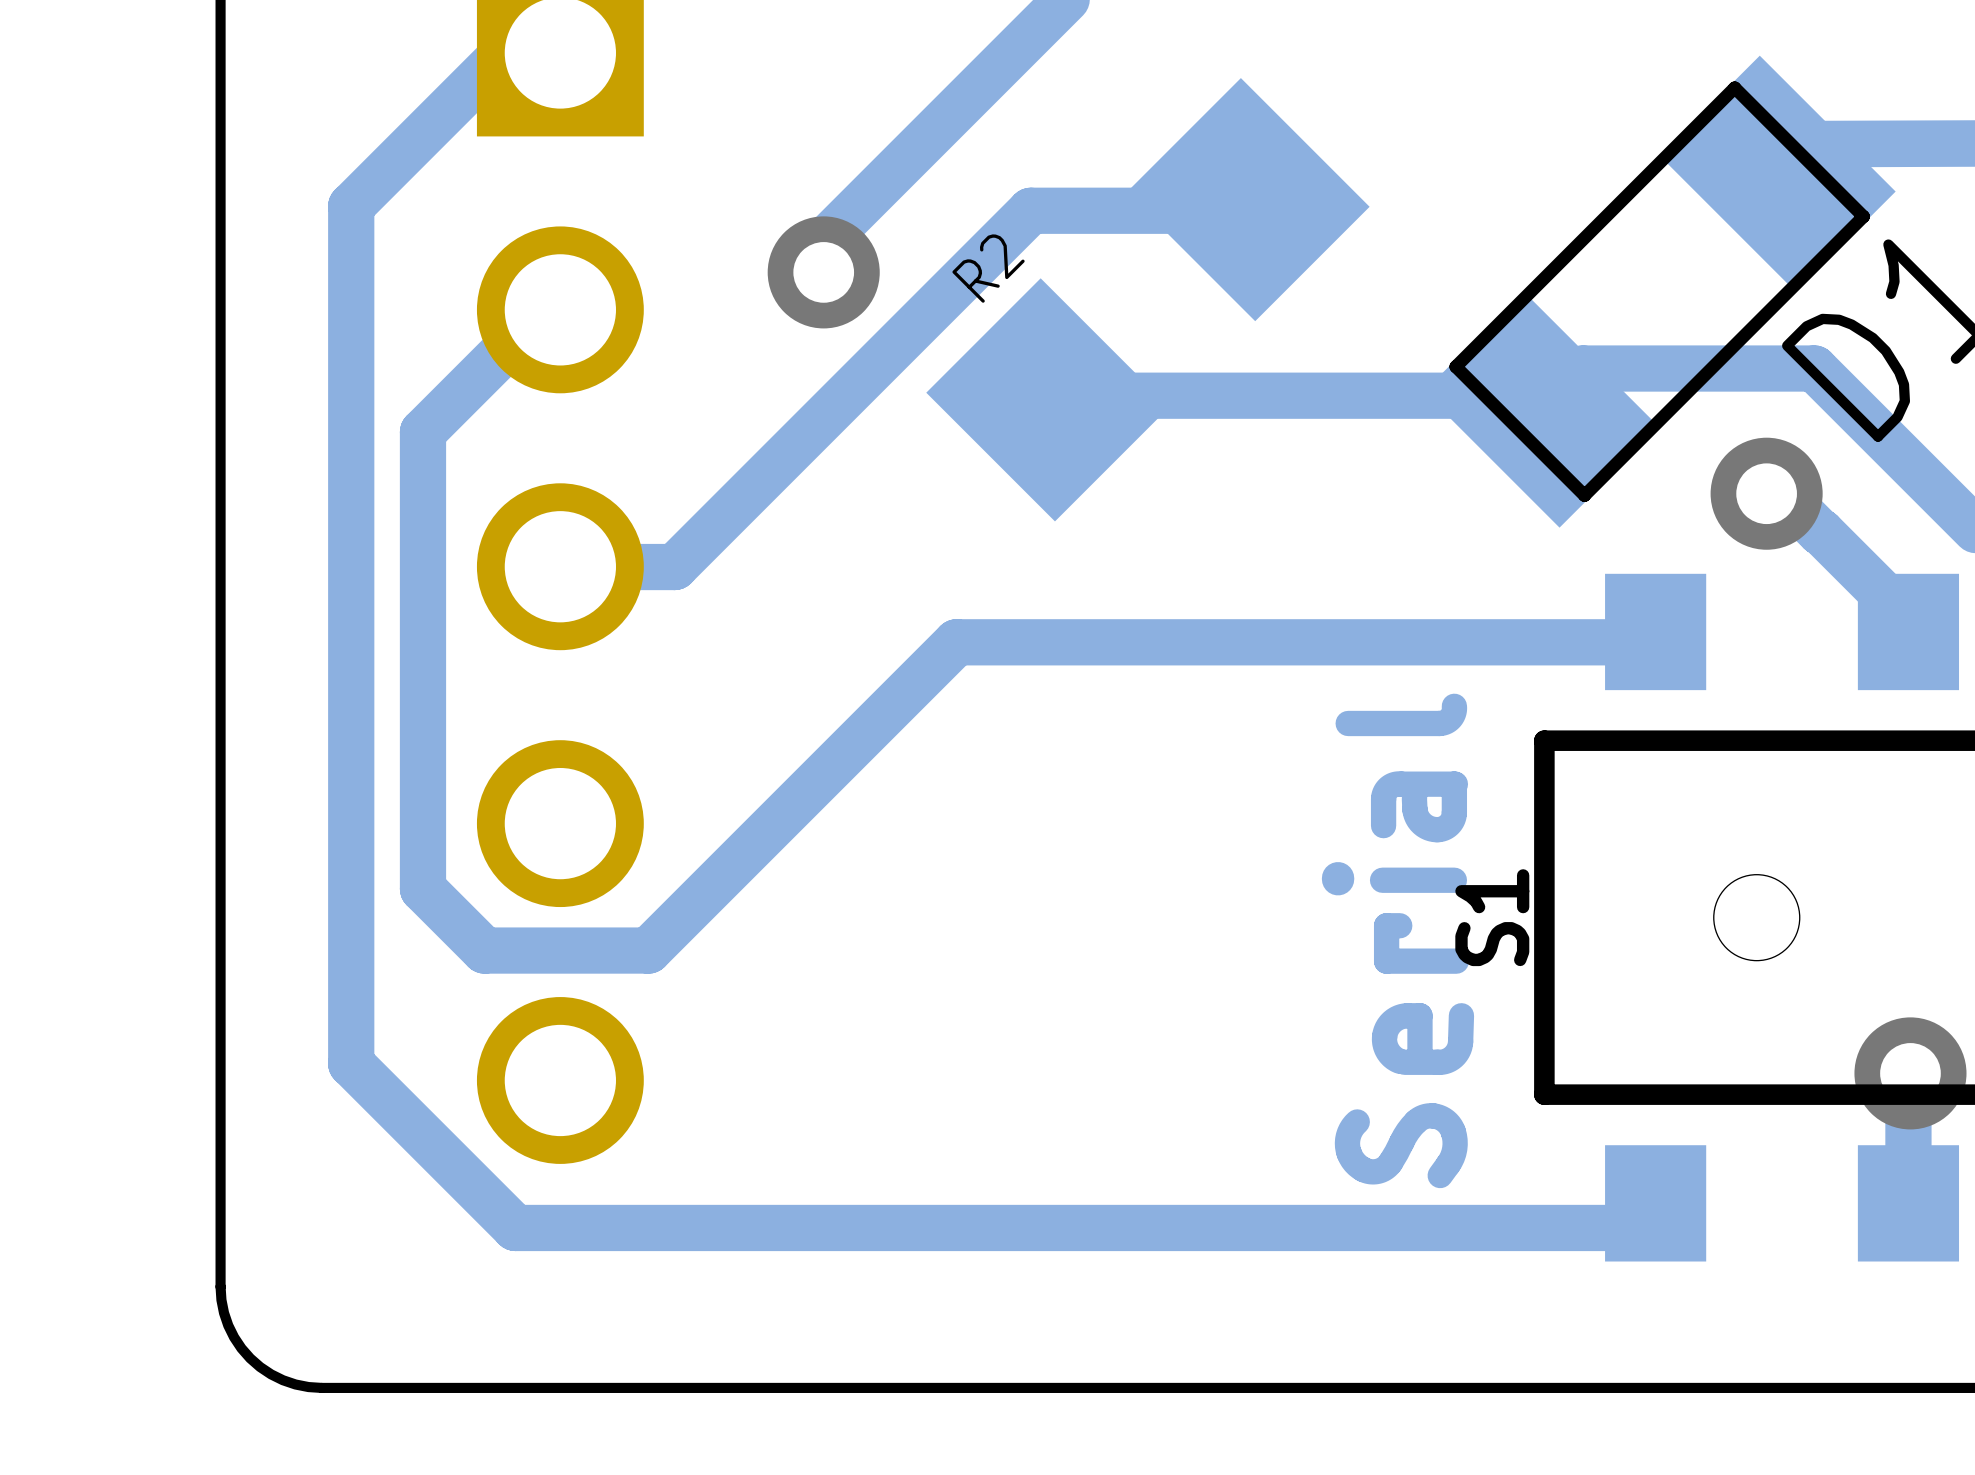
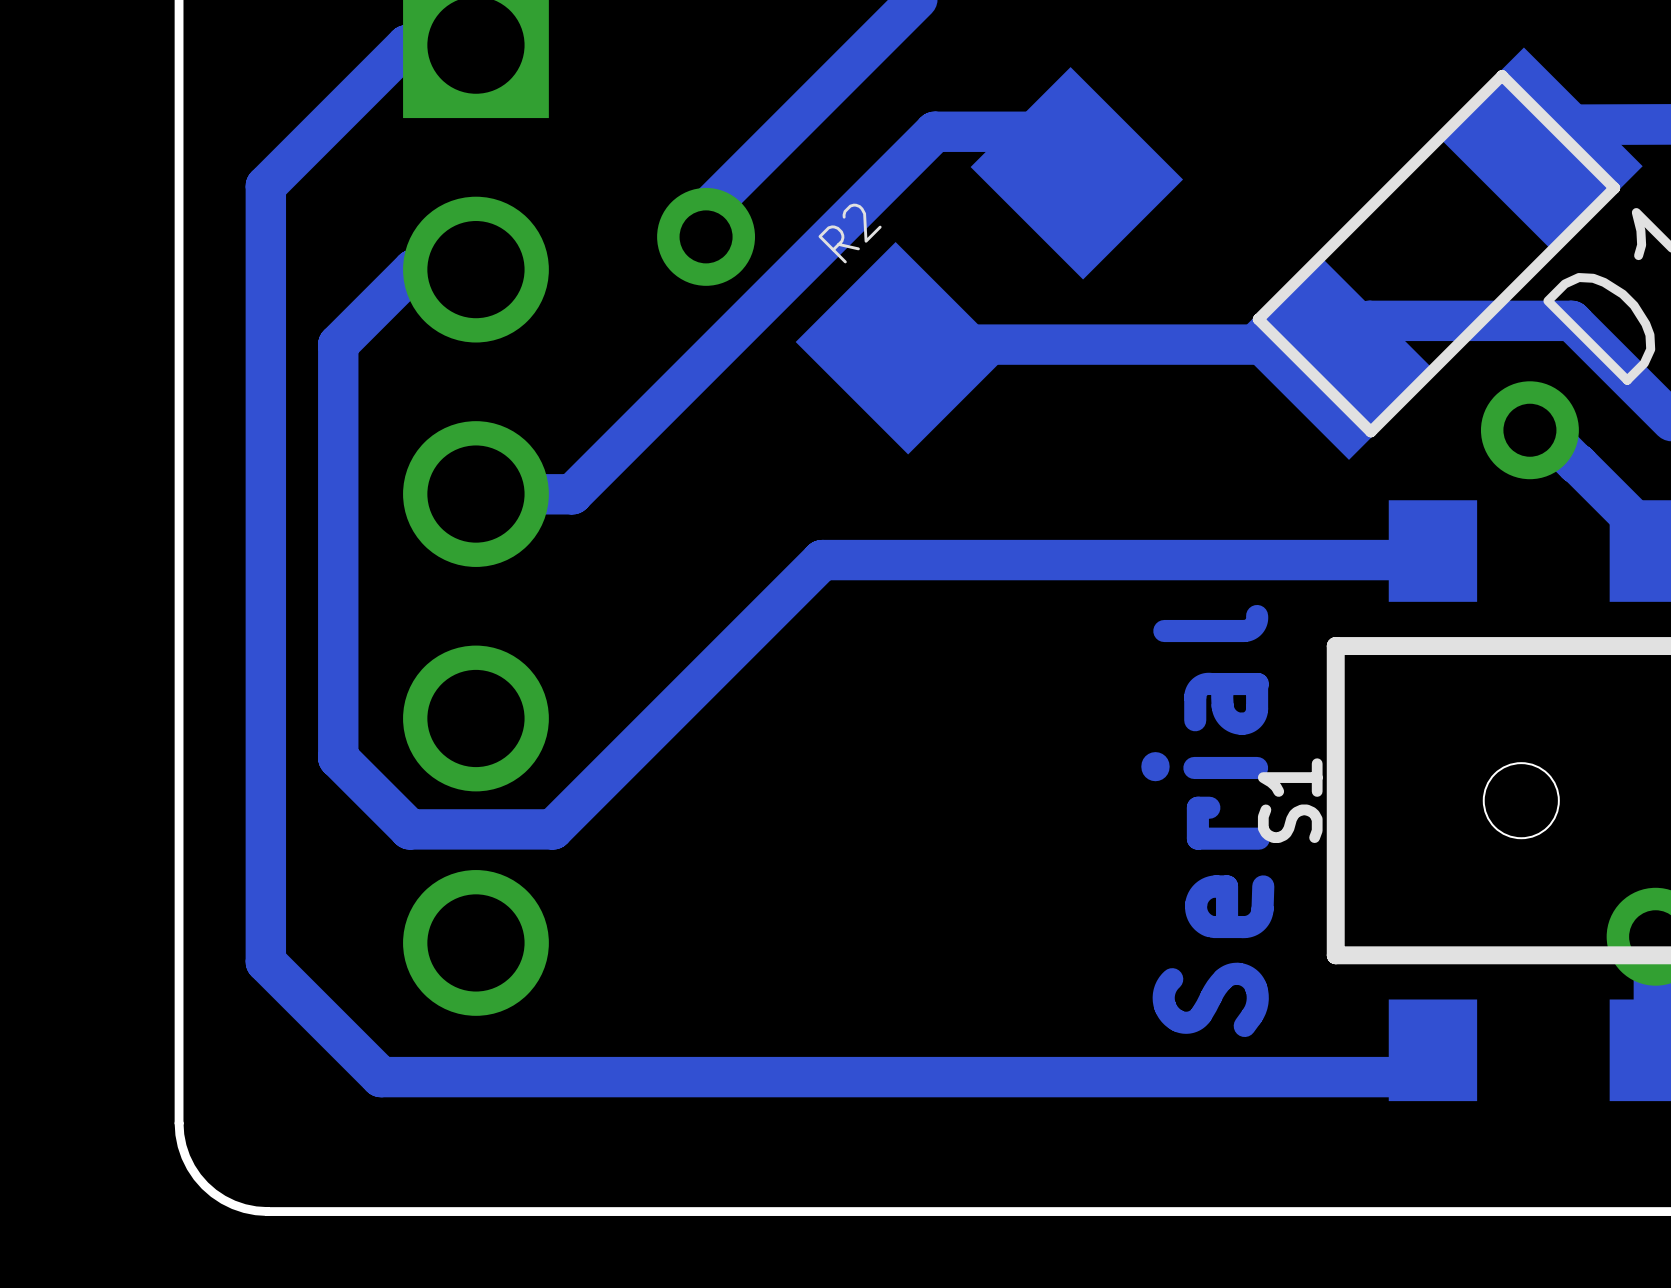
track: (504, 52) (351, 206) (351, 1063) (515, 1227) (1625, 1227) -> (427, 45) (406, 45) (265, 186) (265, 961) (381, 1077) (1399, 1077) (1406, 1071)
track: (1248, 199) (1224, 210) (1030, 210) (674, 567) (670, 567) -> (1076, 173) (1035, 131) (934, 131) (572, 494)
track: (545, 309) (422, 432) (422, 888) -> (462, 269) (413, 269) (338, 344) (338, 757) (355, 775)

